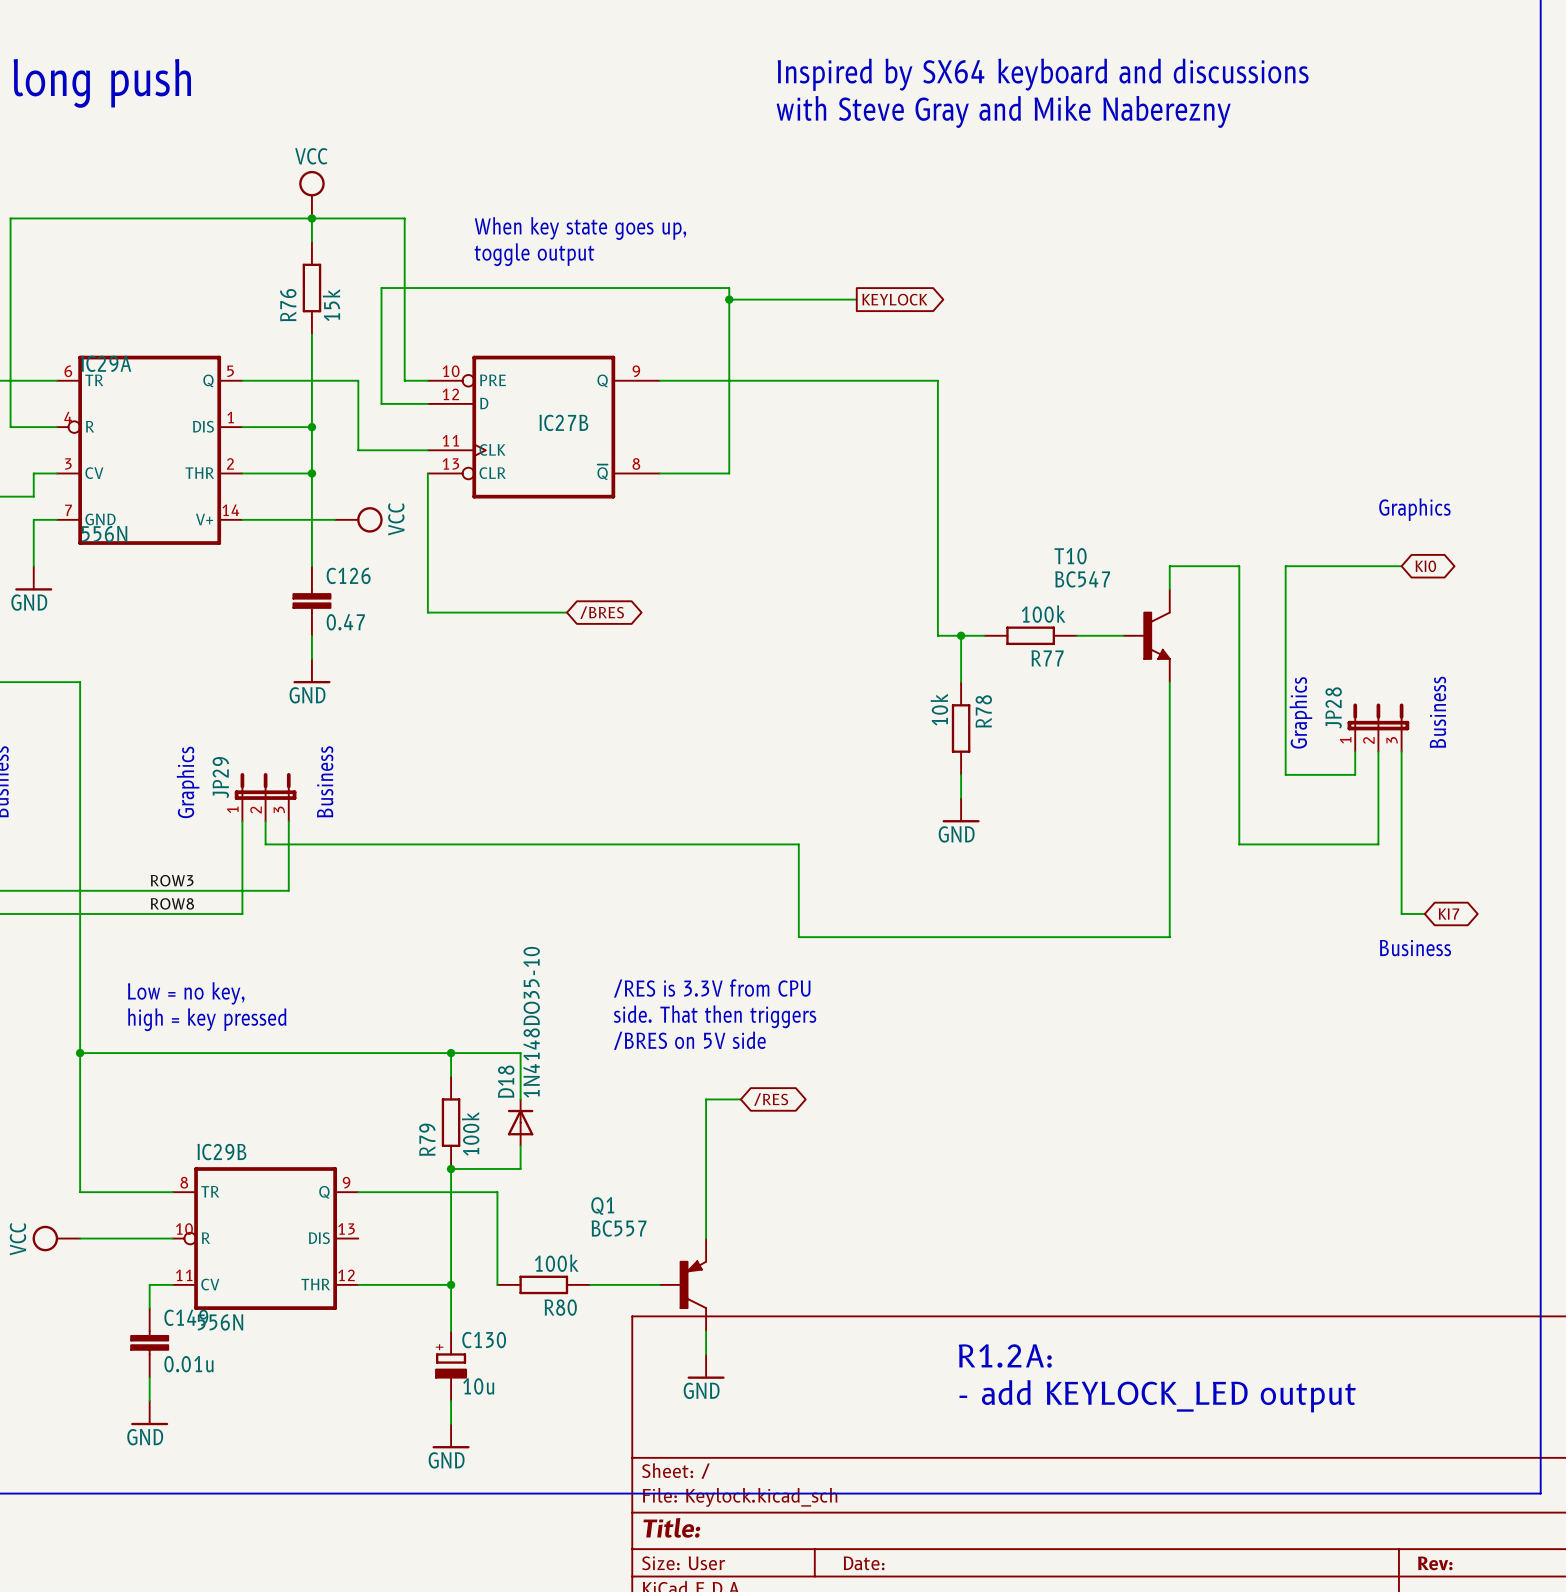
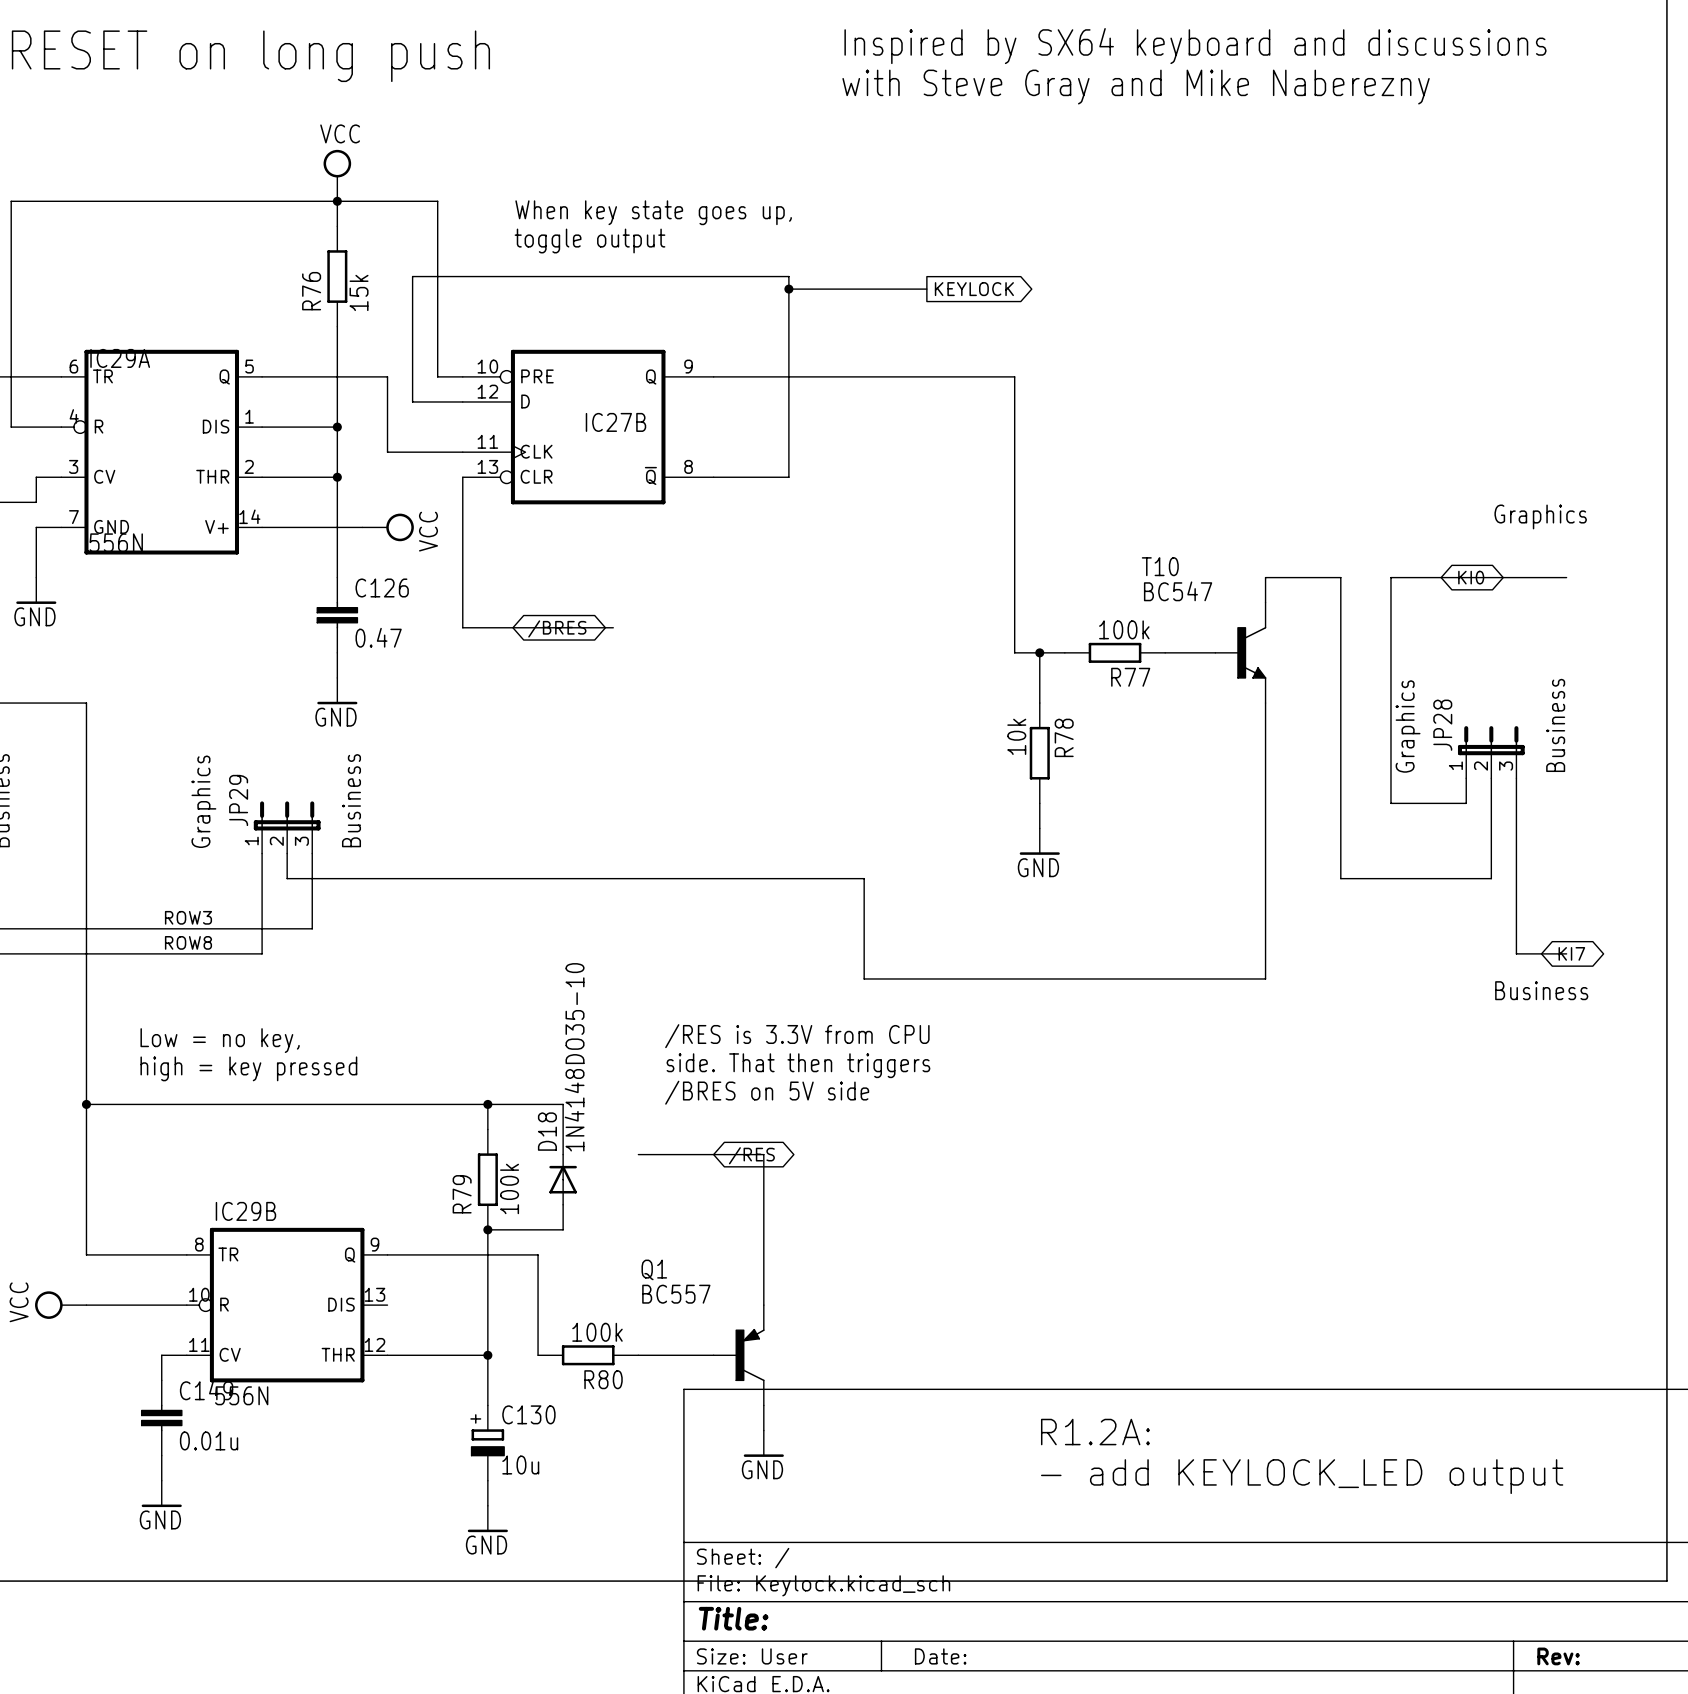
wire: none -> (1516, 577) (1566, 577)
global label position: KI0 (1425, 566) -> KI0 (1471, 577)
global label position: /BRES (602, 612) -> /BRES (557, 628)
wire: none -> (1541, 953) (1566, 953)
wire: (706, 1099) (740, 1099) -> (763, 1154) (638, 1154)
global label position: /RES (771, 1099) -> /RES (751, 1155)

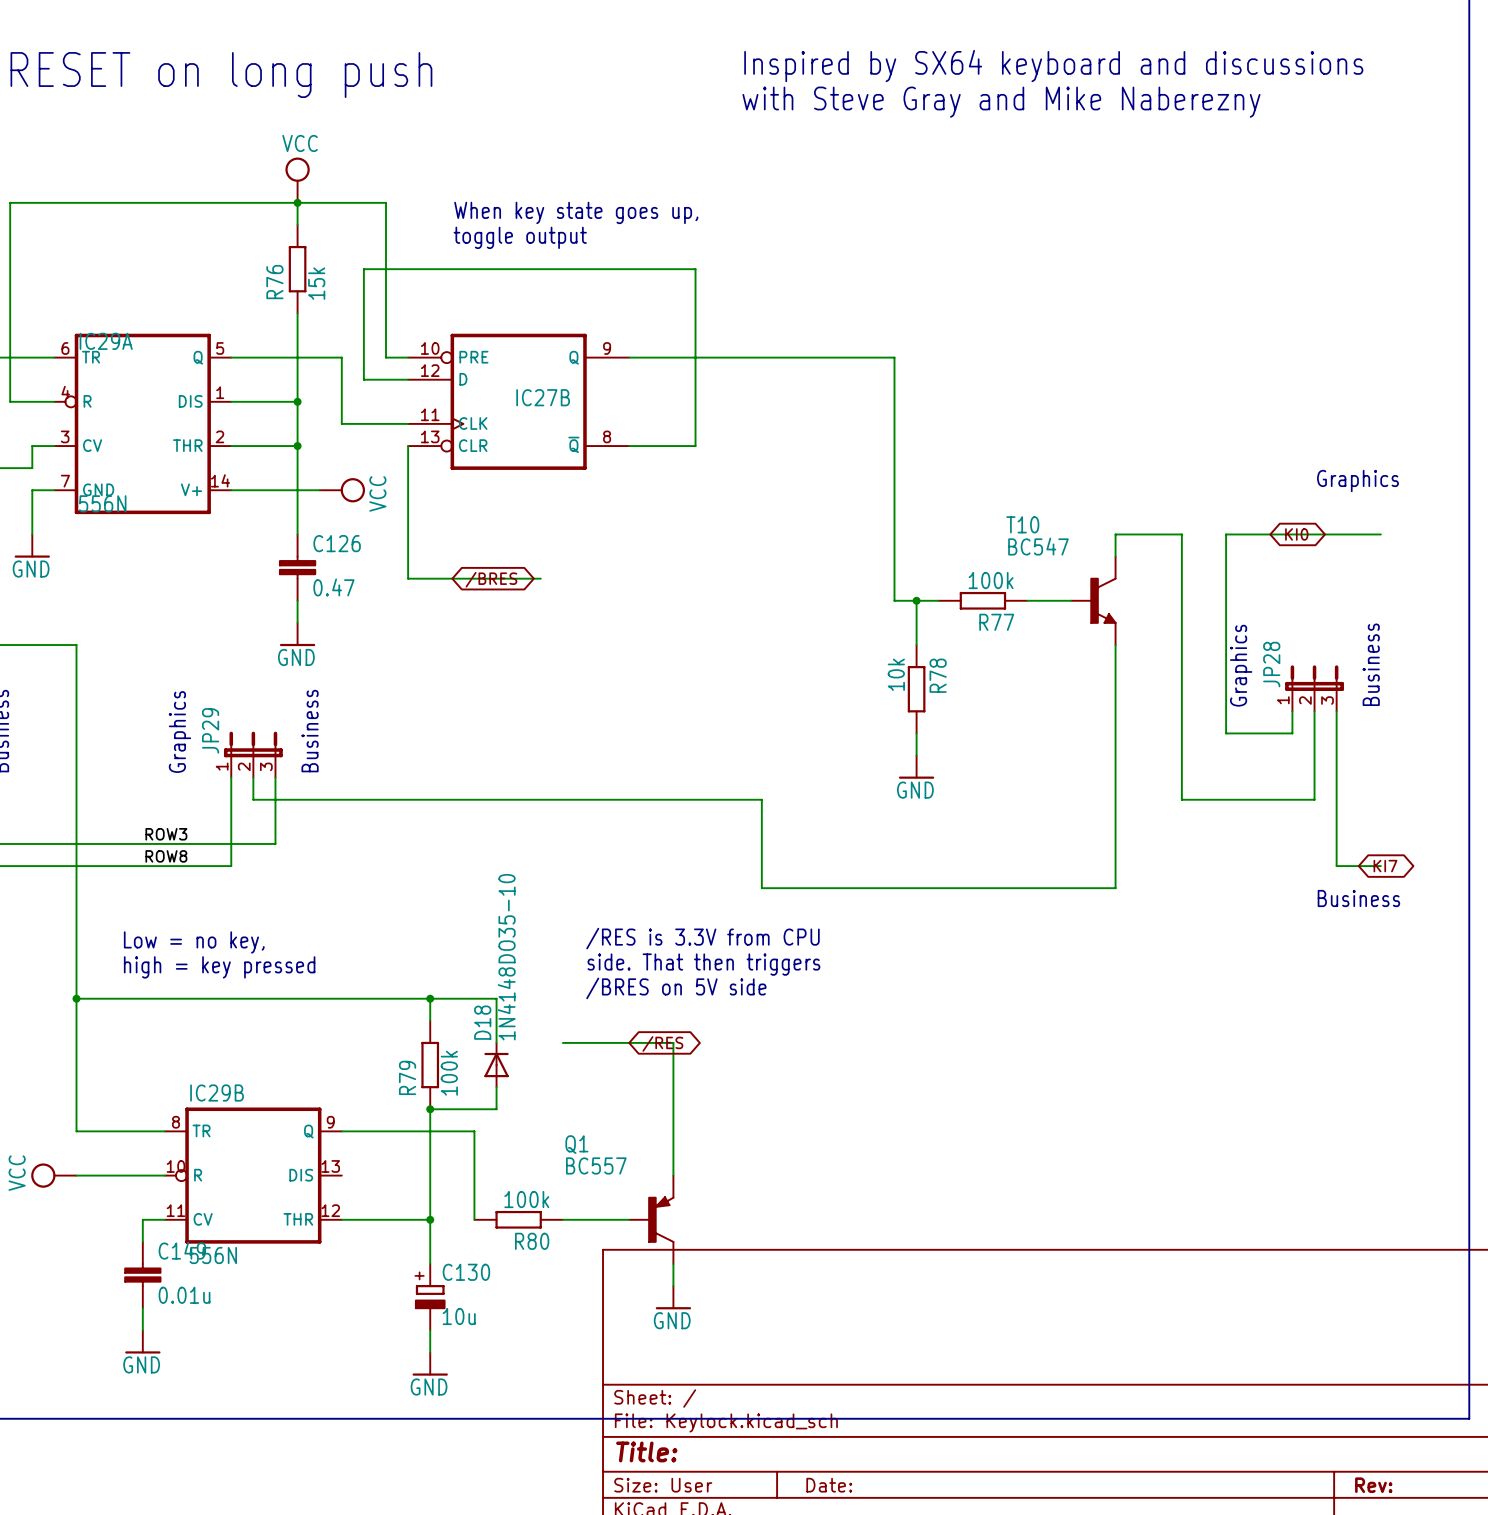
wire: (788, 289) (926, 289) -> none
junction: (788, 289) -> none
global label: KEYLOCK (974, 289) -> none
text: R1.2A: (1095, 1432) -> none
text: - add KEYLOCK_LED output (1302, 1476) -> none

